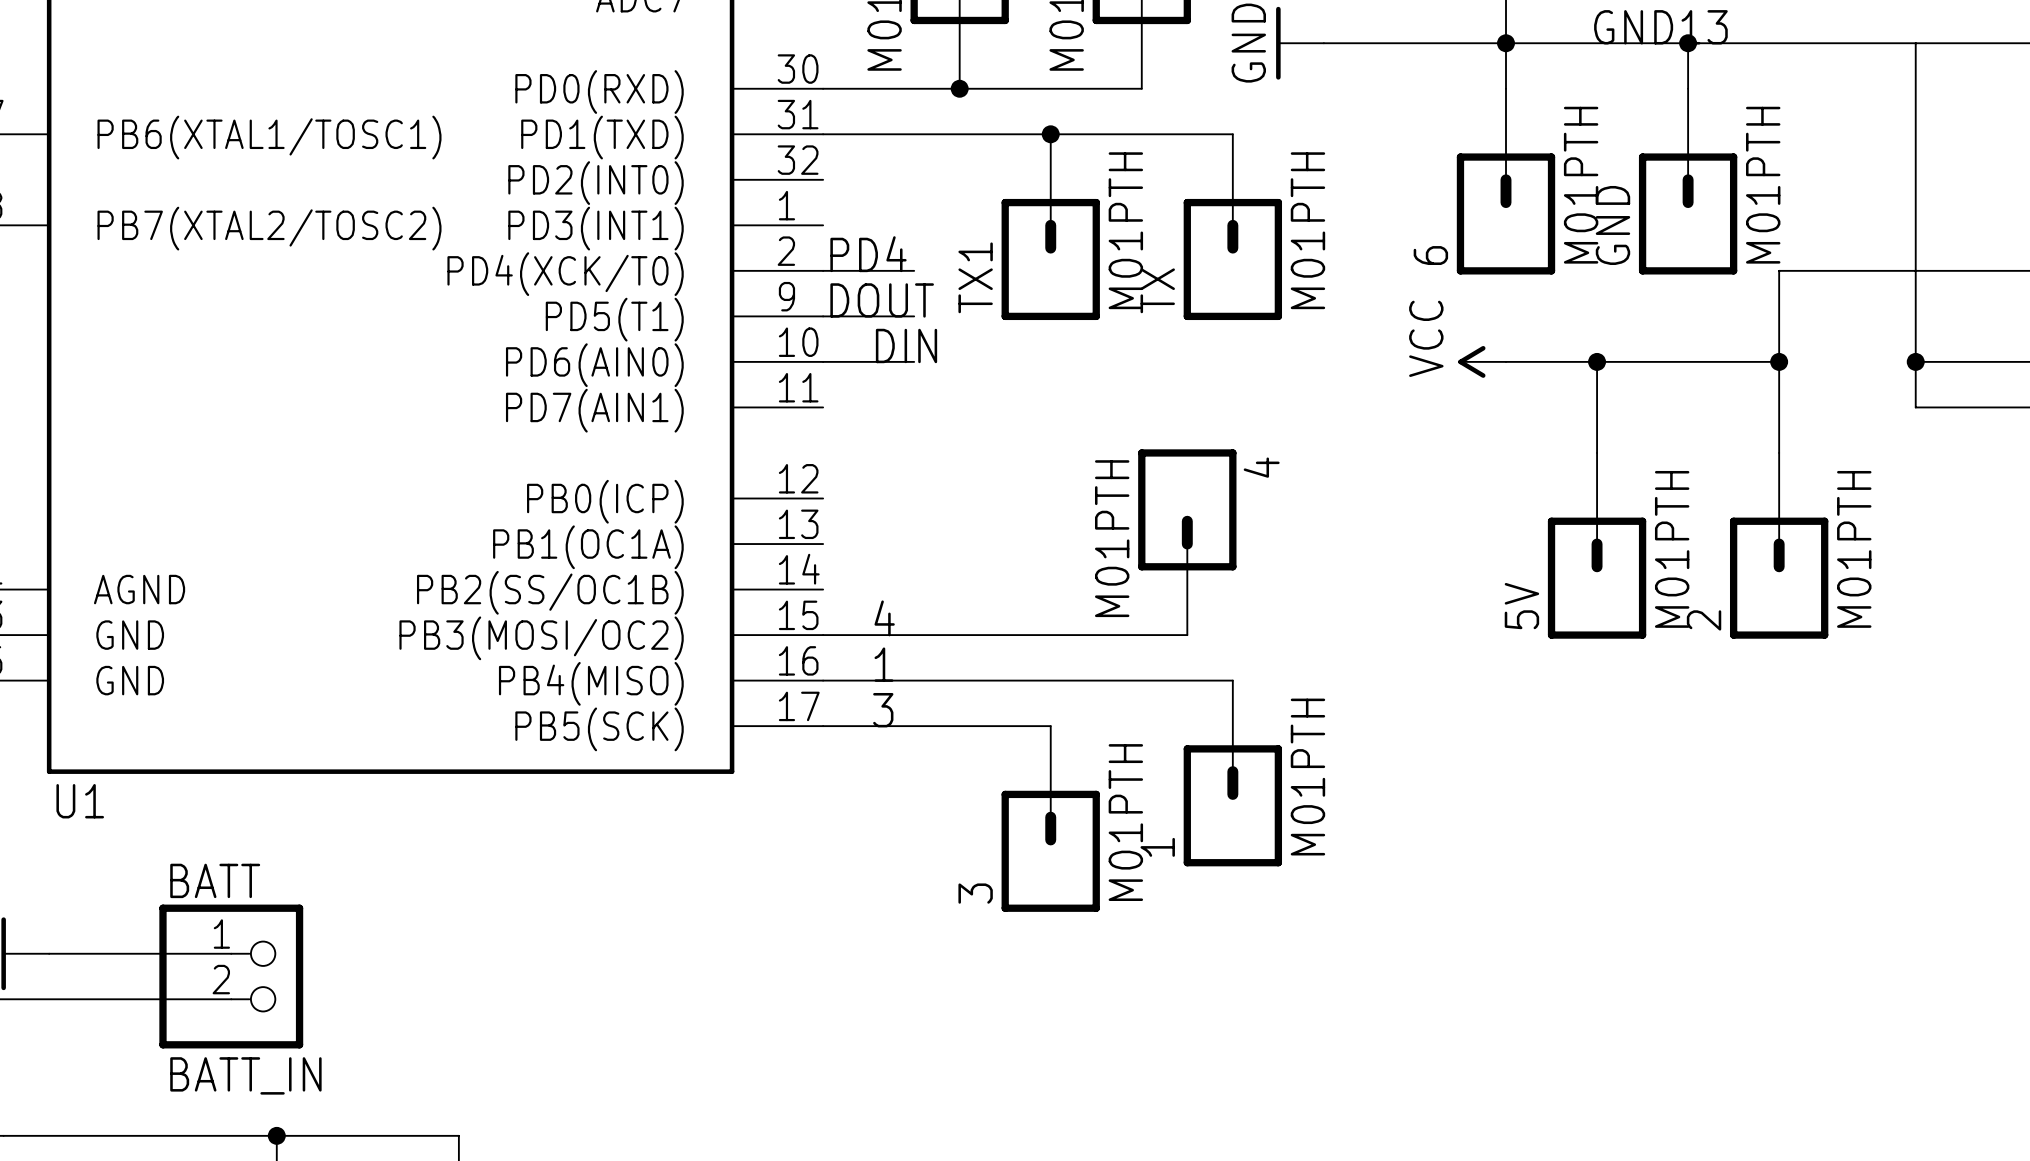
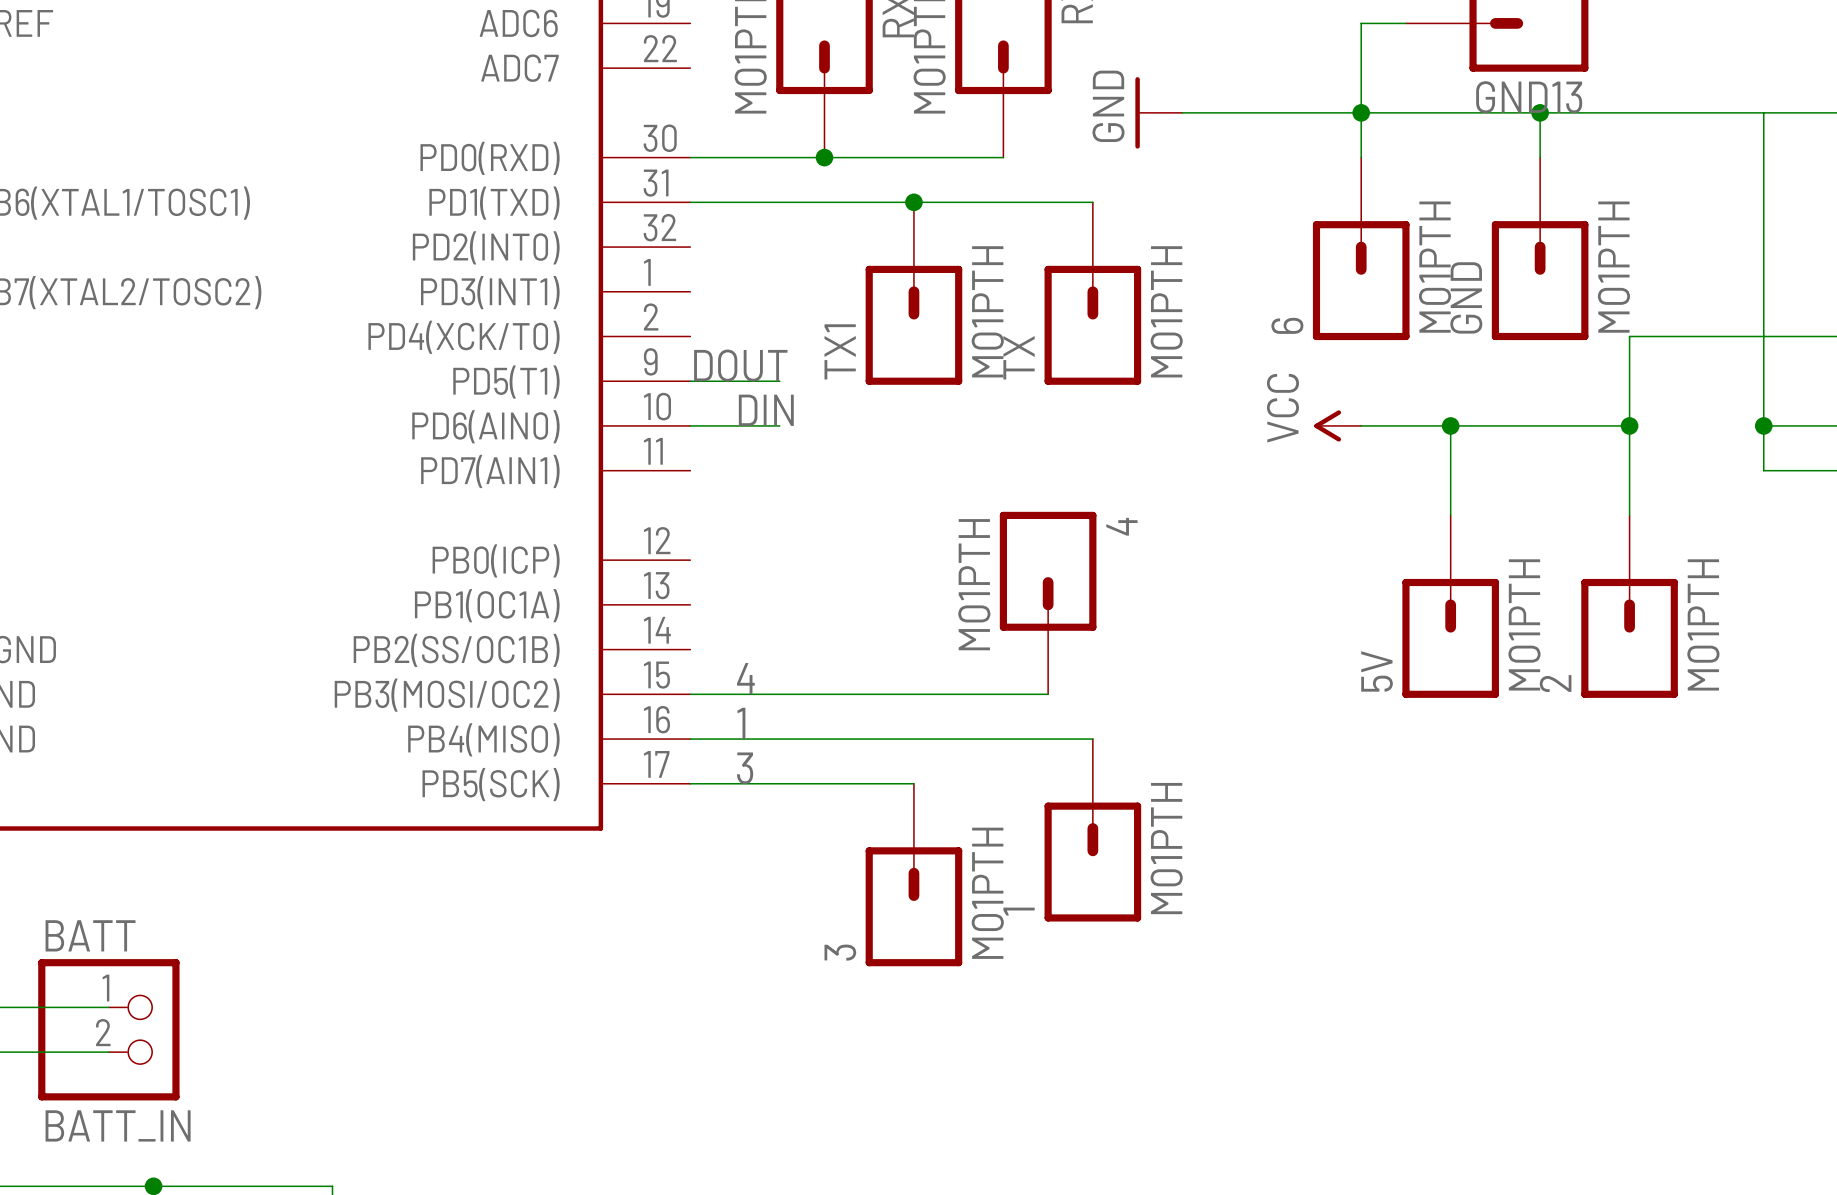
label: PD4 (868, 254) -> none
wire: (823, 270) (914, 270) -> none

